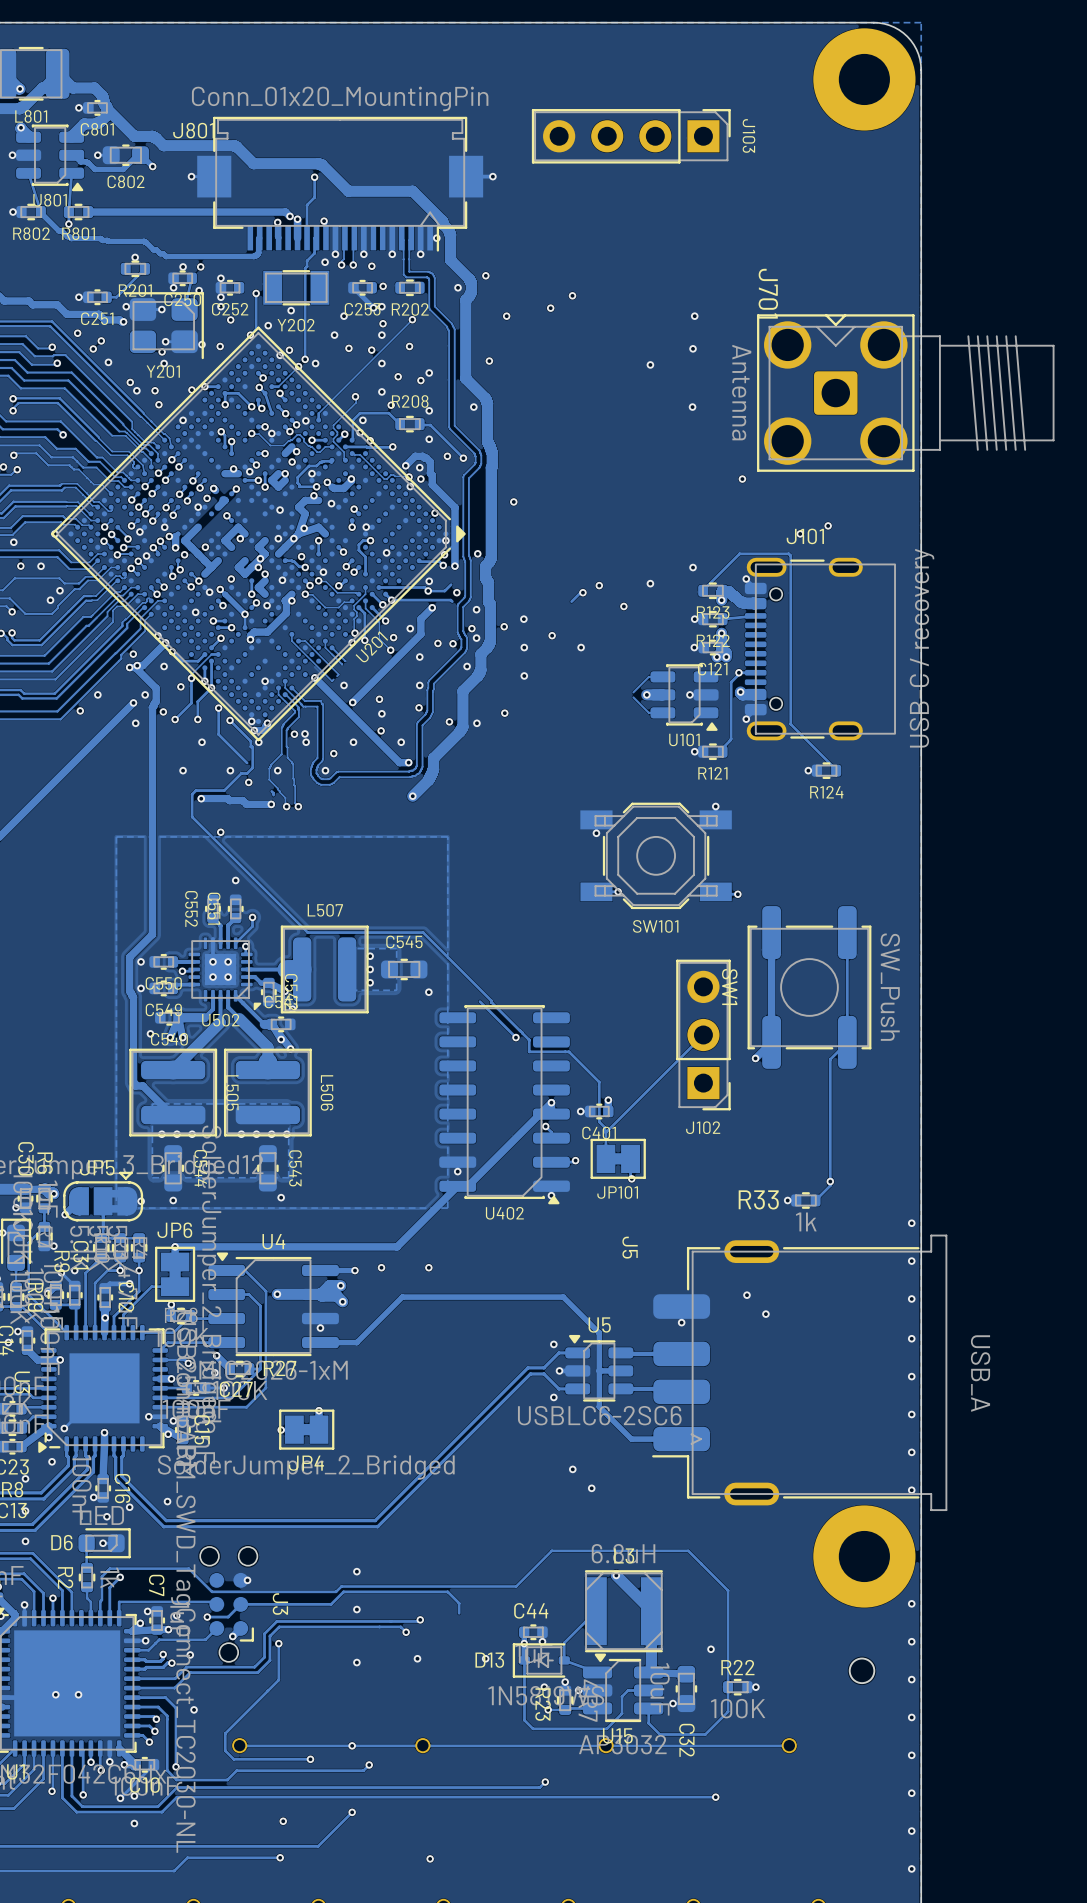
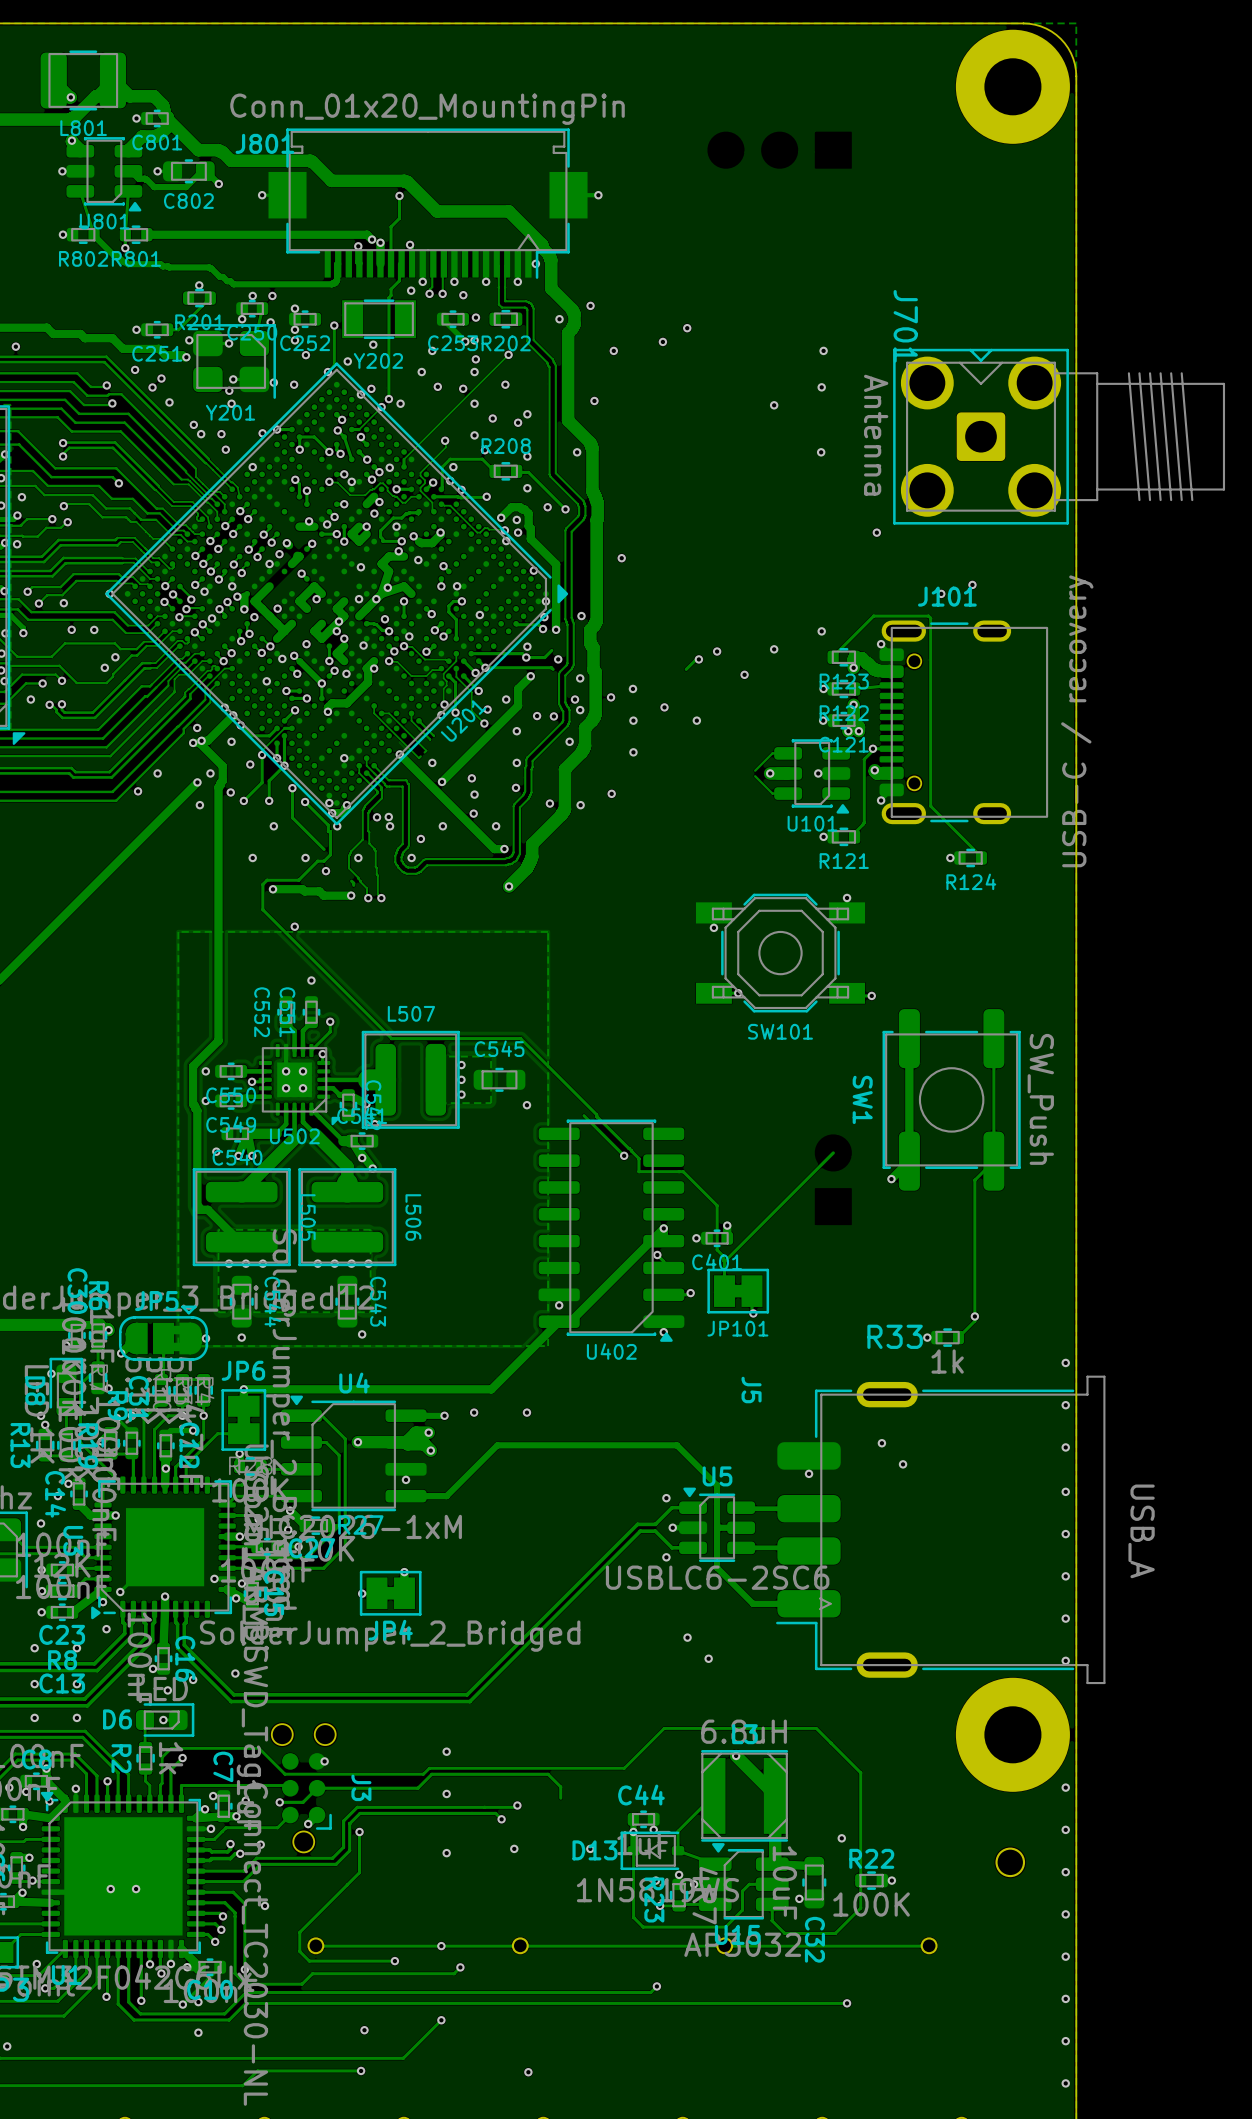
J103: (631, 136) -> none
J102: (703, 1035) -> none

